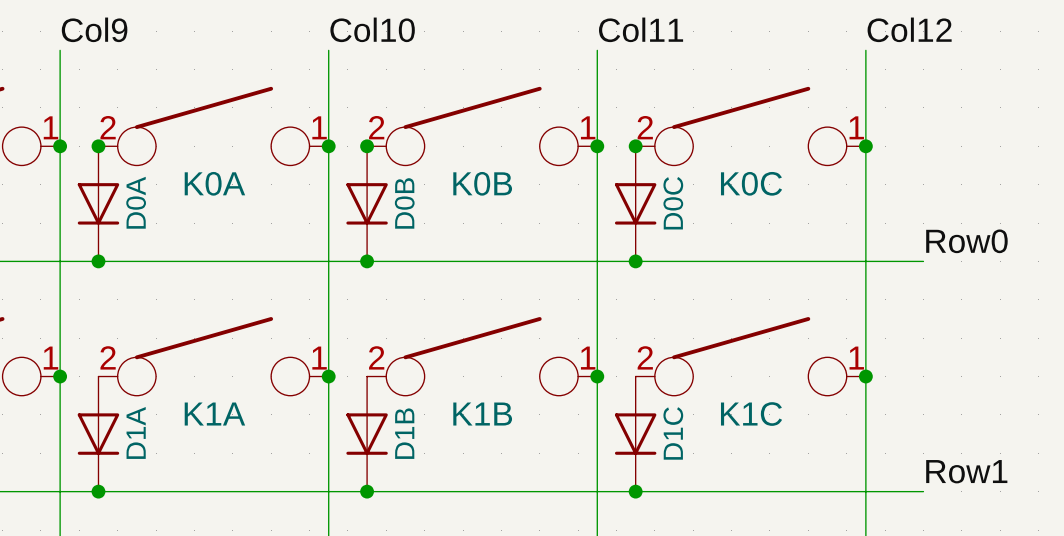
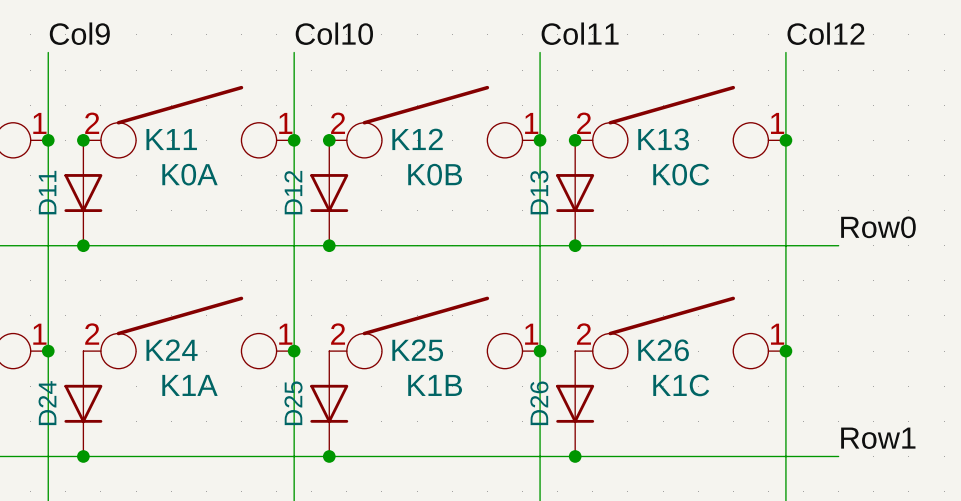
K11 name: none -> K11 (171, 139)
K12 name: none -> K12 (417, 139)
K13 name: none -> K13 (663, 139)
D11 value: D0A (136, 202) -> none
D11 name: none -> D11 (47, 192)
D12 name: none -> D12 (293, 192)
D12 value: D0B (404, 203) -> none
D13 name: none -> D13 (539, 192)
D13 value: D0C (673, 203) -> none
K24 name: none -> K24 (172, 350)
K25 name: none -> K25 (417, 350)
K26 name: none -> K26 (663, 350)
D24 value: D1A (136, 432) -> none
D24 name: none -> D24 (47, 403)
D25 name: none -> D25 (293, 403)
D25 value: D1B (404, 433) -> none
D26 name: none -> D26 (539, 403)
D26 value: D1C (673, 433) -> none

